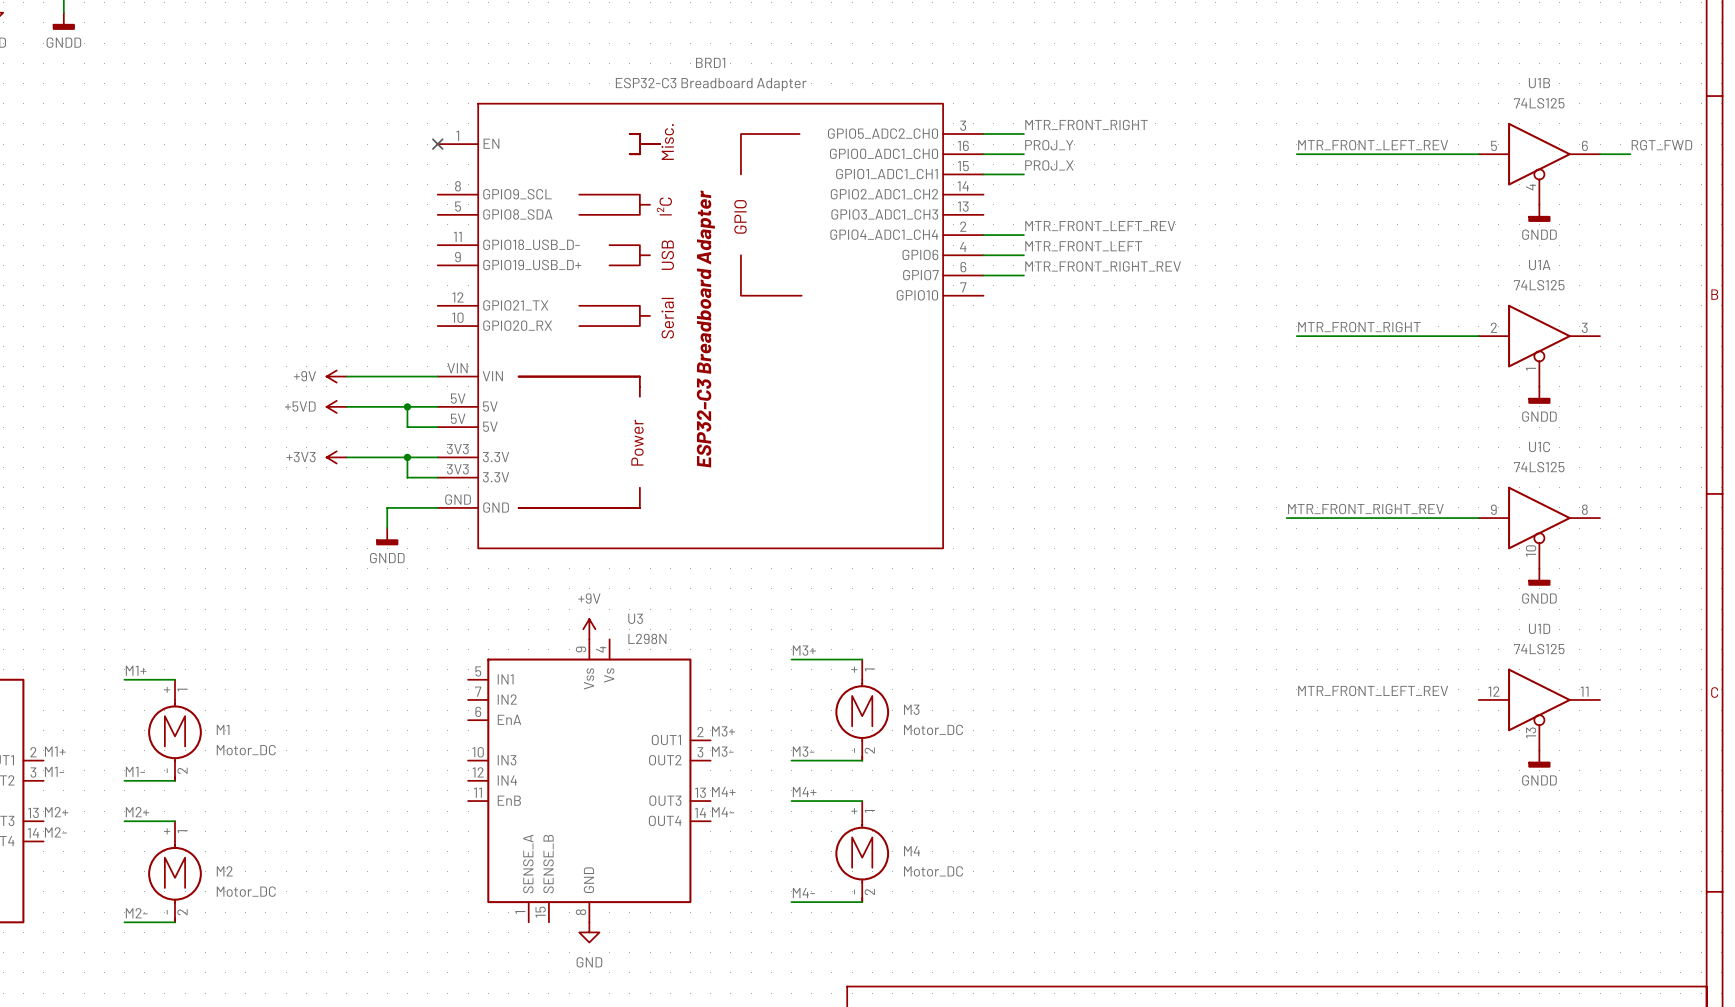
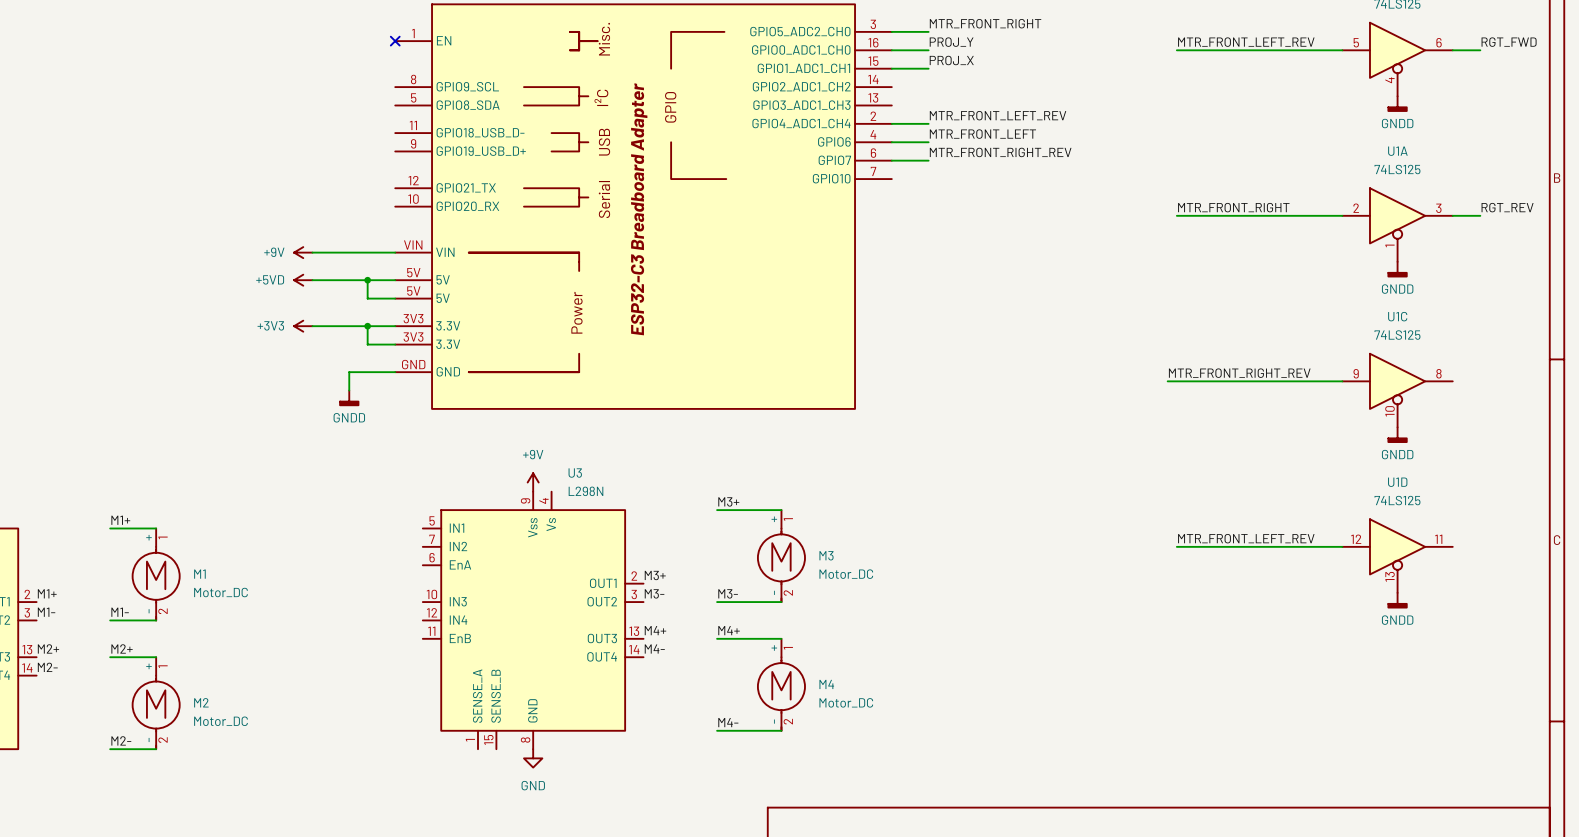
label: none -> RGT_REV (1507, 207)
wire: none -> (1452, 215) (1480, 215)
wire: none -> (1176, 546) (1342, 546)

